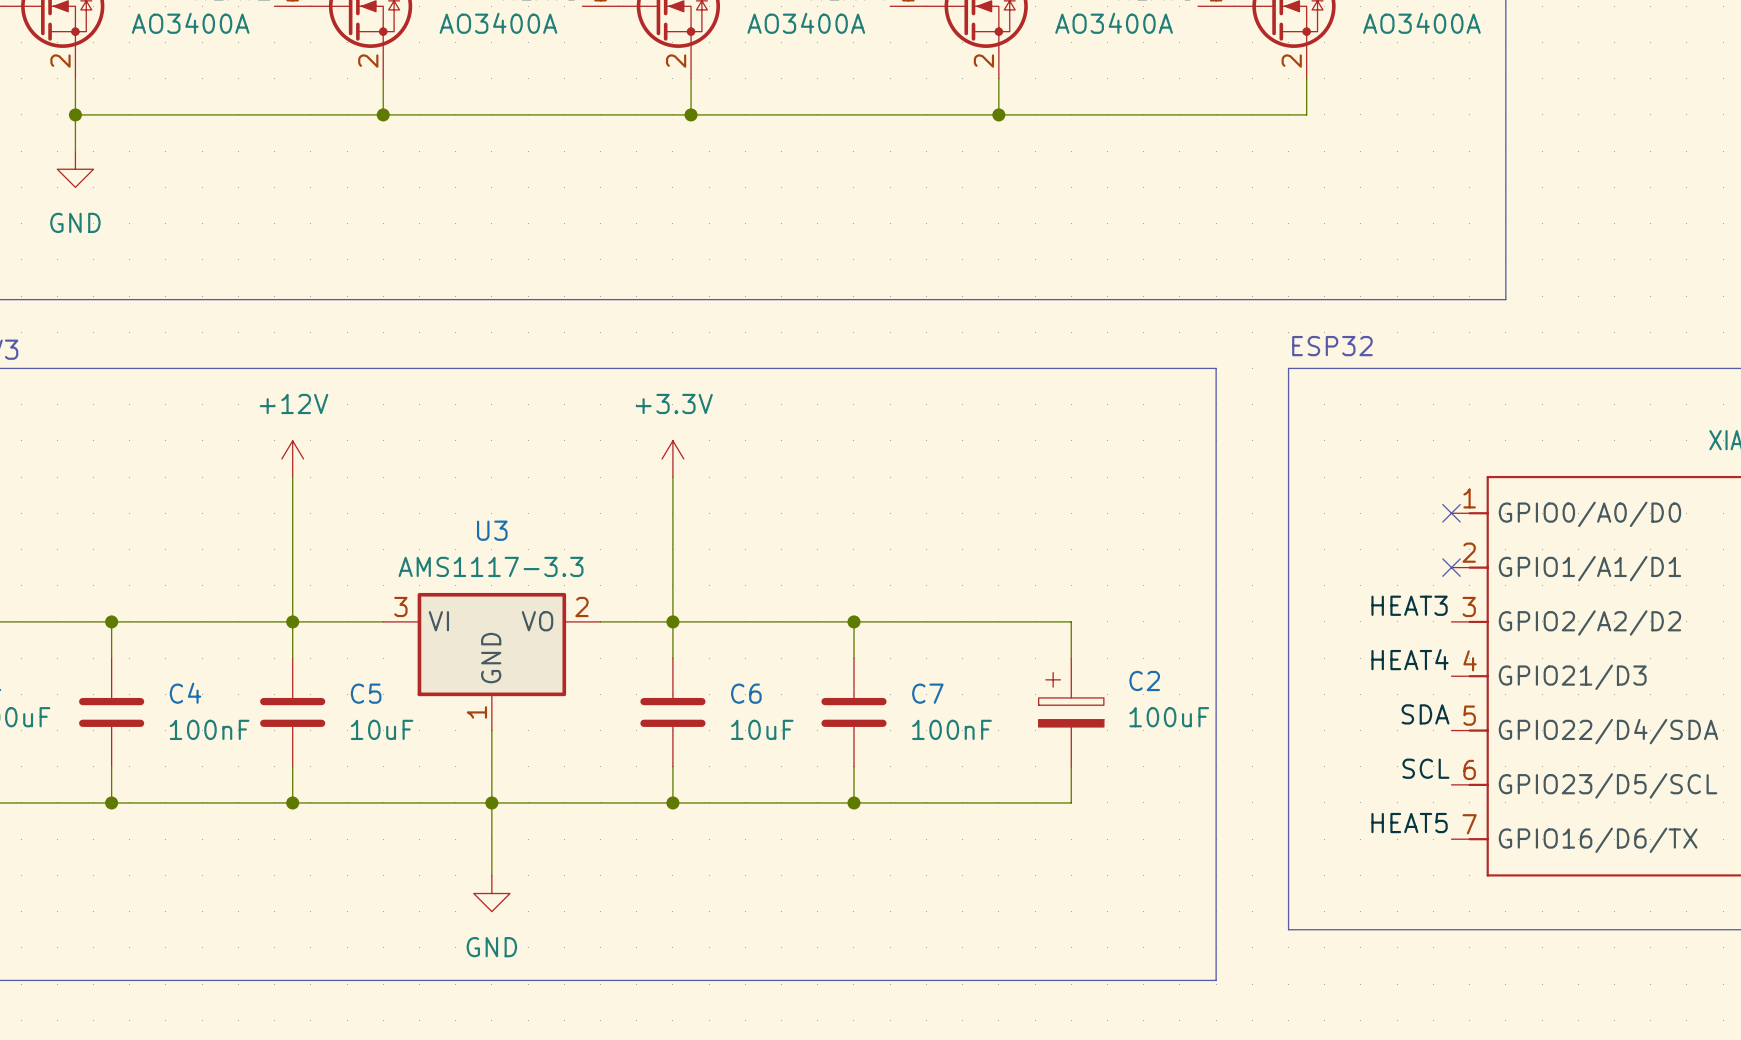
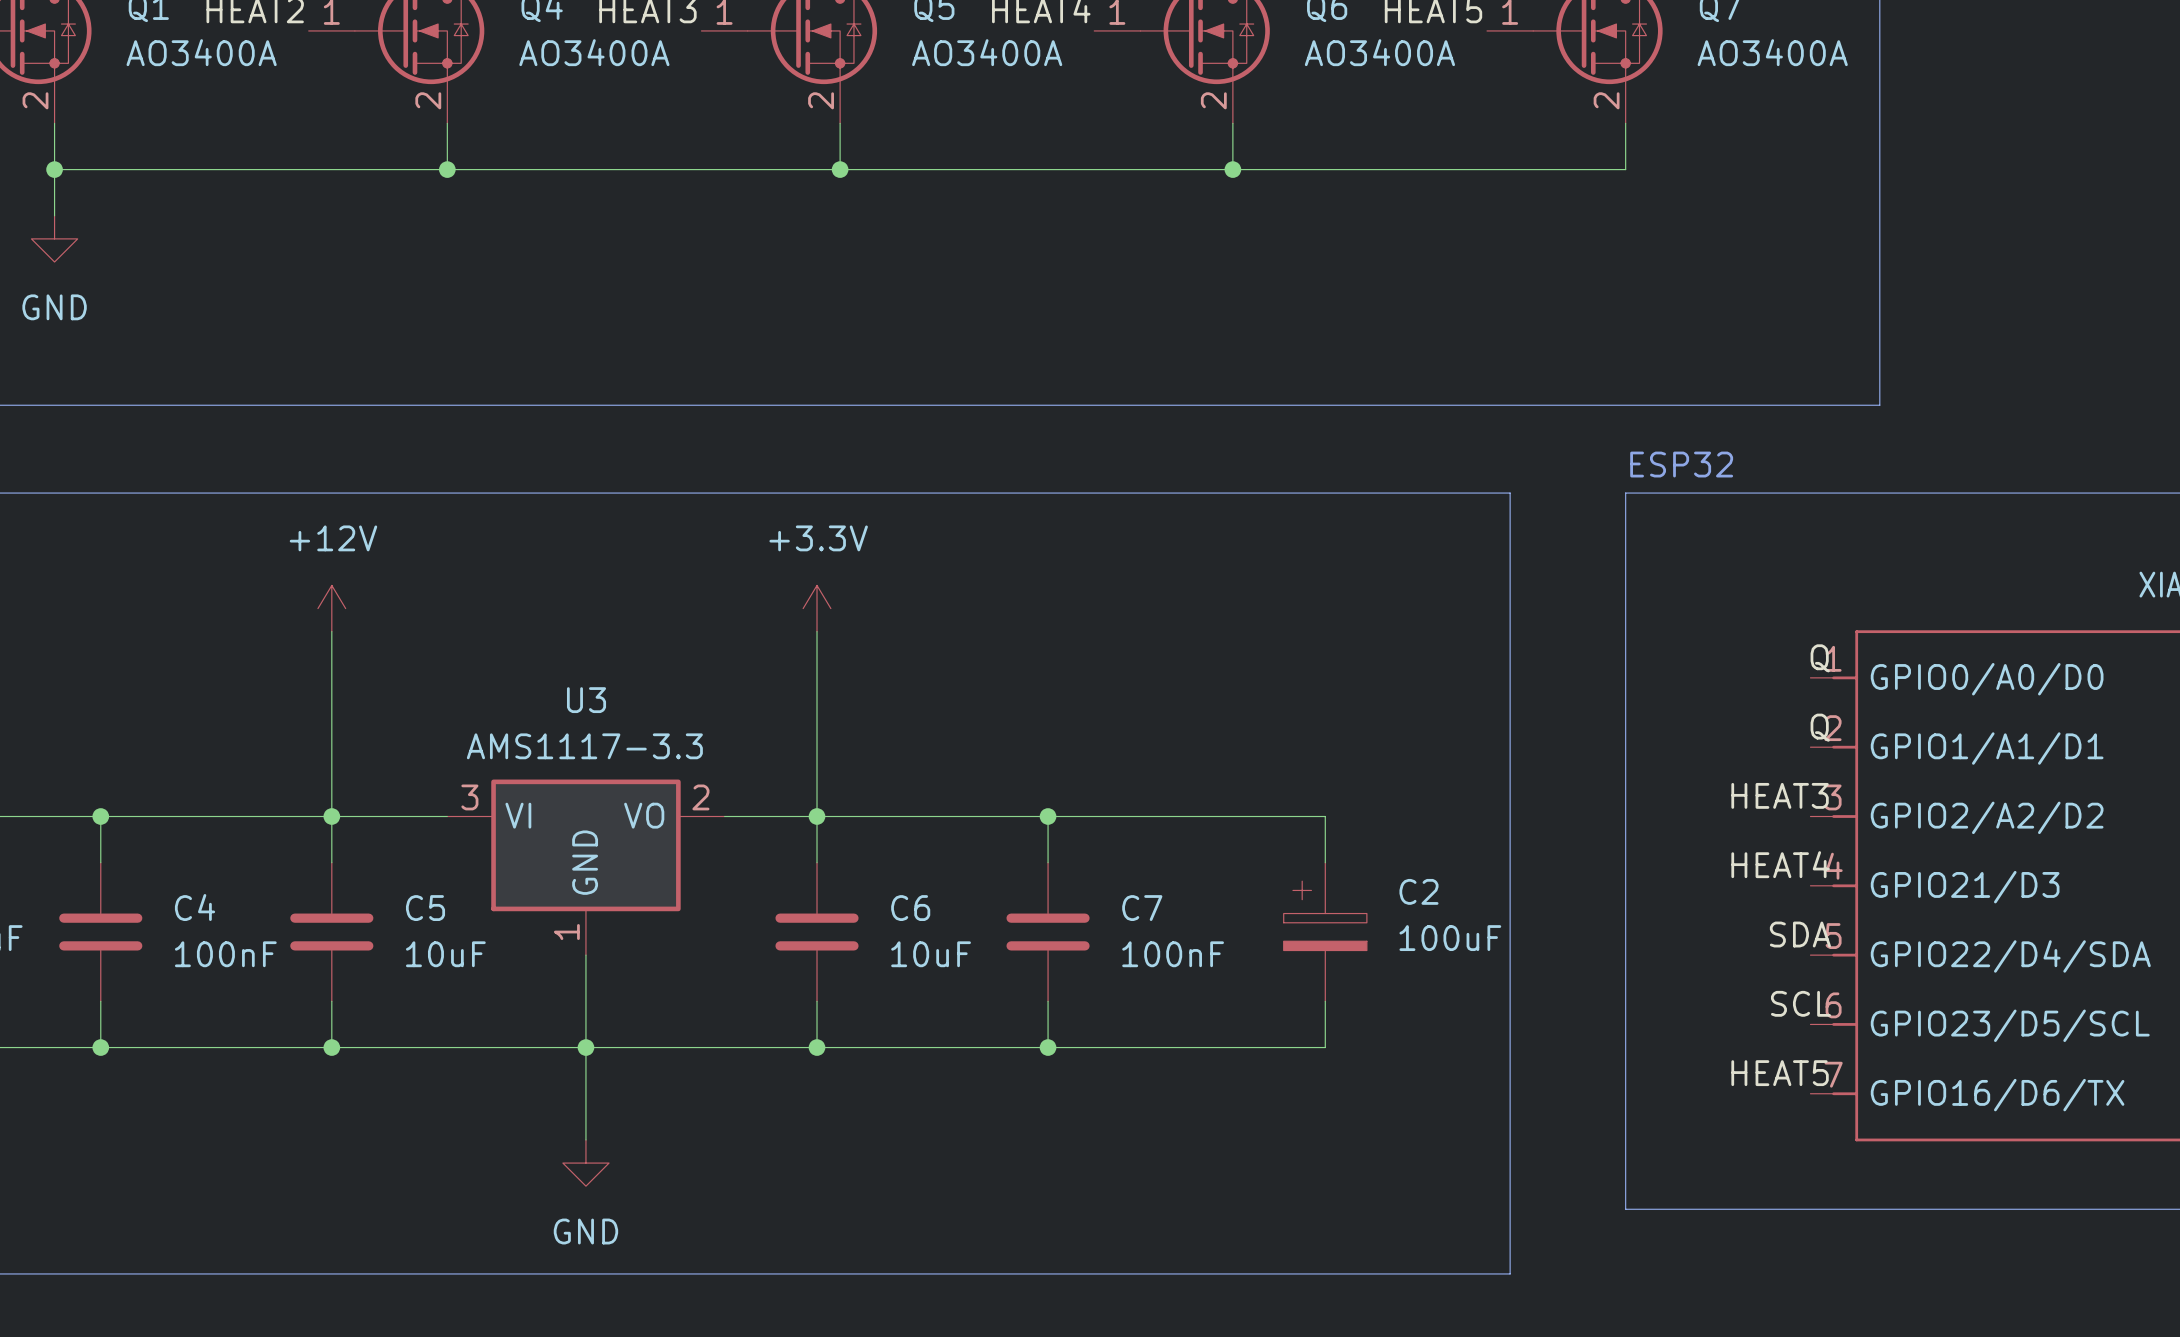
text position: ESP32 (1332, 346) -> ESP32 (1681, 464)
line: (1306, 368) (1288, 368) (1288, 929) (1306, 929) -> (1625, 493) (1625, 1209)
label: none -> Q (1820, 658)
no-connect mark: (1451, 513) -> none
label: none -> Q (1820, 727)
no-connect mark: (1451, 567) -> none
label position: HEAT3 (1409, 605) -> HEAT3 (1780, 795)
label position: HEAT4 (1409, 659) -> HEAT4 (1780, 864)
label position: SDA (1425, 714) -> SDA (1800, 934)
label position: SCL (1425, 768) -> SCL (1800, 1003)
label position: HEAT5 (1409, 823) -> HEAT5 (1780, 1073)

